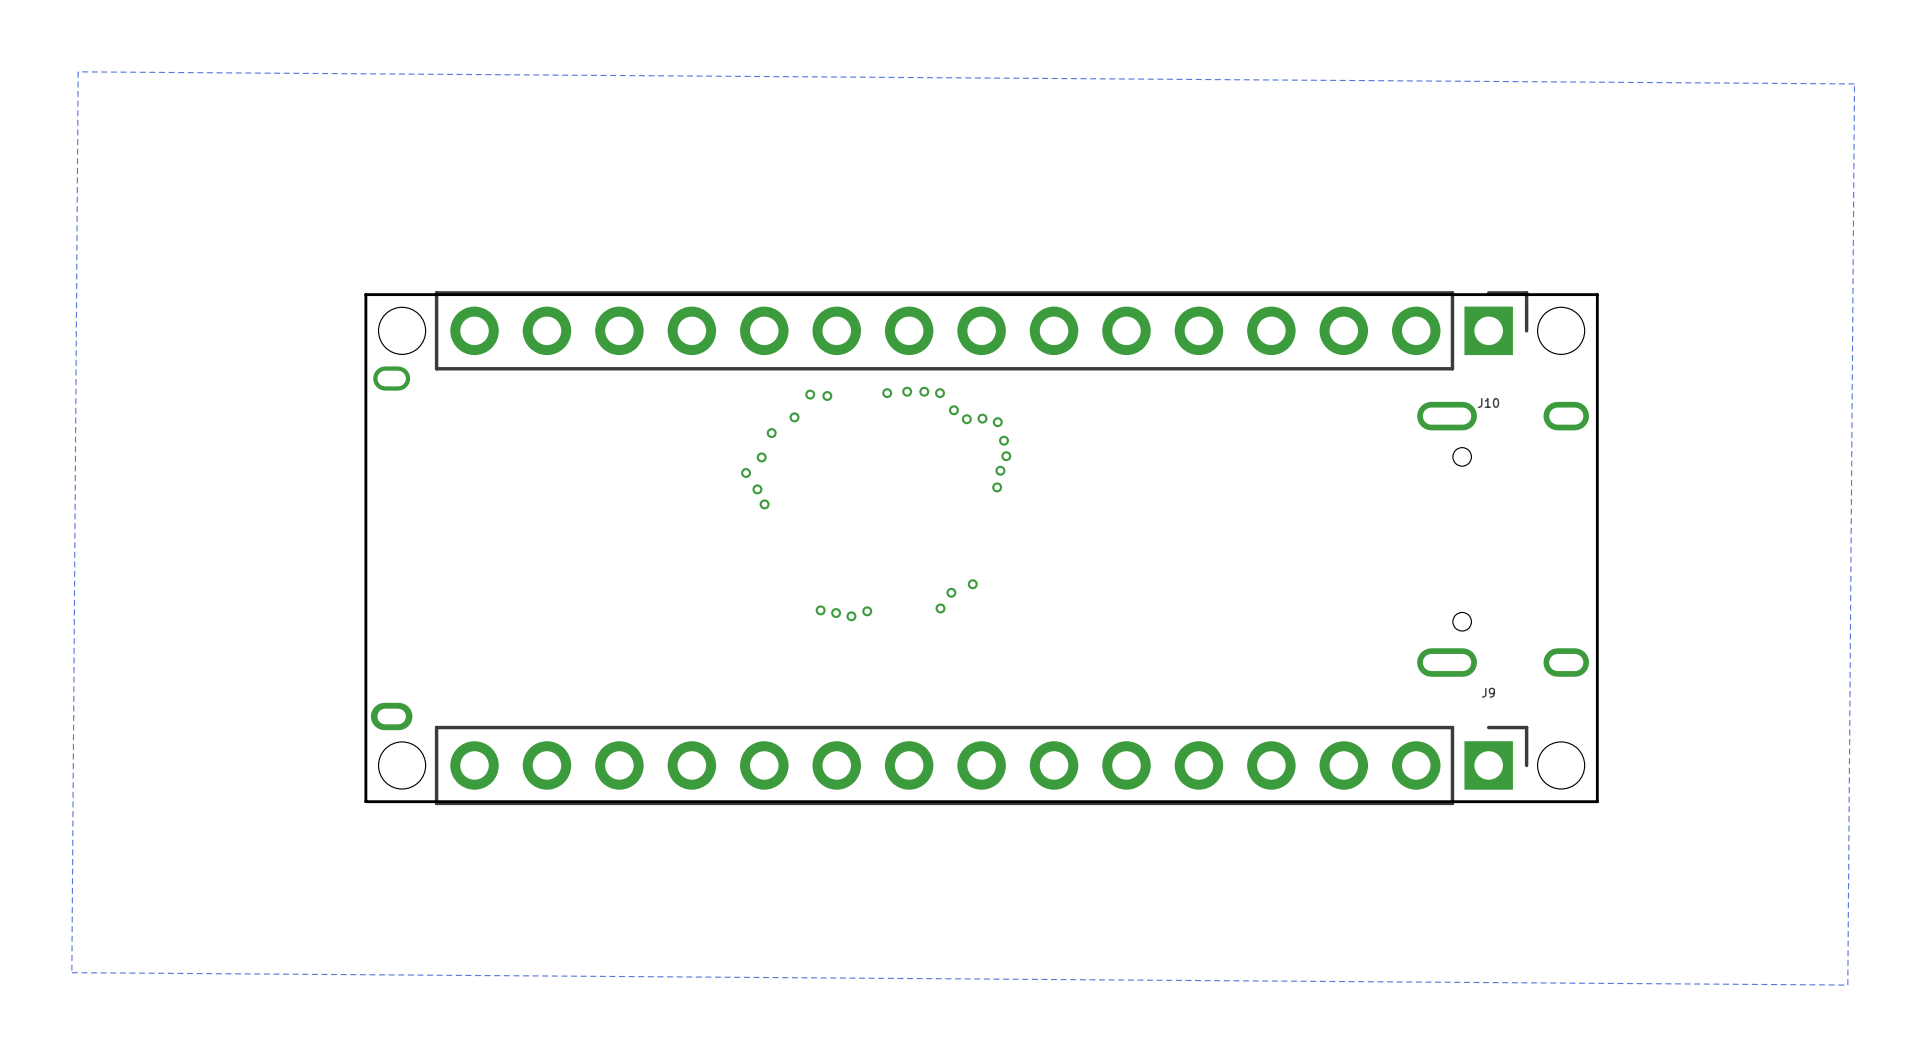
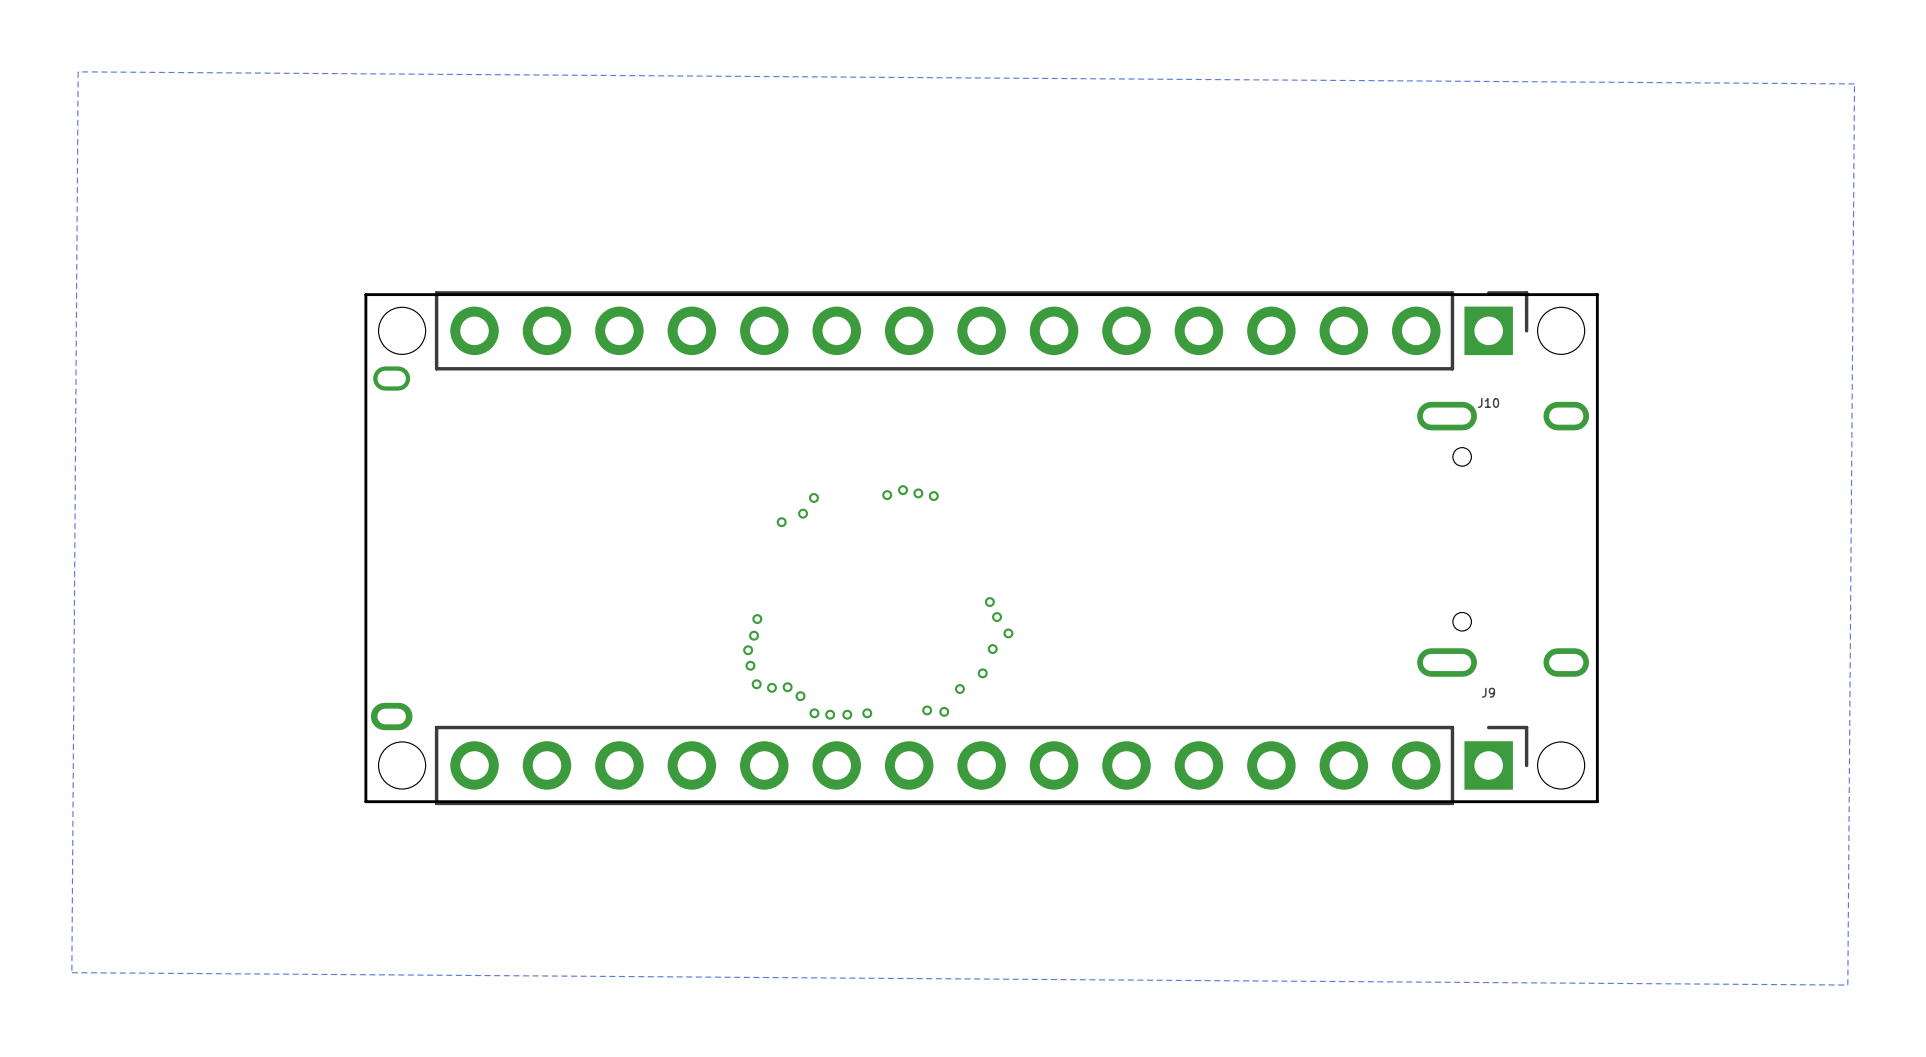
via: (907, 391) -> none
via: (924, 391) -> none
via: (887, 393) -> none
via: (940, 393) -> none
via: (810, 394) -> none
via: (827, 396) -> none
via: (953, 410) -> none
via: (794, 417) -> none
via: (982, 418) -> none
via: (966, 419) -> none
via: (997, 422) -> none
via: (771, 433) -> none
via: (1003, 440) -> none
via: (1006, 456) -> none
via: (761, 457) -> none
via: (1000, 470) -> none
via: (746, 473) -> none
via: (997, 487) -> none
via: (757, 489) -> none
via: none -> (903, 490)
via: none -> (918, 493)
via: none -> (887, 495)
via: none -> (933, 496)
via: none -> (813, 497)
via: (764, 504) -> none
via: none -> (803, 513)
via: none -> (781, 522)
via: (972, 584) -> none
via: (951, 592) -> none
via: none -> (989, 602)
via: (940, 608) -> none
via: (820, 610) -> none
via: (867, 611) -> none
via: (836, 613) -> none
via: (851, 616) -> none
via: none -> (997, 617)
via: none -> (757, 619)
via: none -> (1008, 633)
via: none -> (754, 635)
via: none -> (992, 649)
via: none -> (748, 650)
via: none -> (750, 665)
via: none -> (982, 673)
via: none -> (756, 684)
via: none -> (771, 687)
via: none -> (787, 687)
via: none -> (959, 689)
via: none -> (800, 696)
via: none -> (927, 710)
via: none -> (944, 711)
via: none -> (814, 713)
via: none -> (867, 713)
via: none -> (830, 714)
via: none -> (847, 714)

